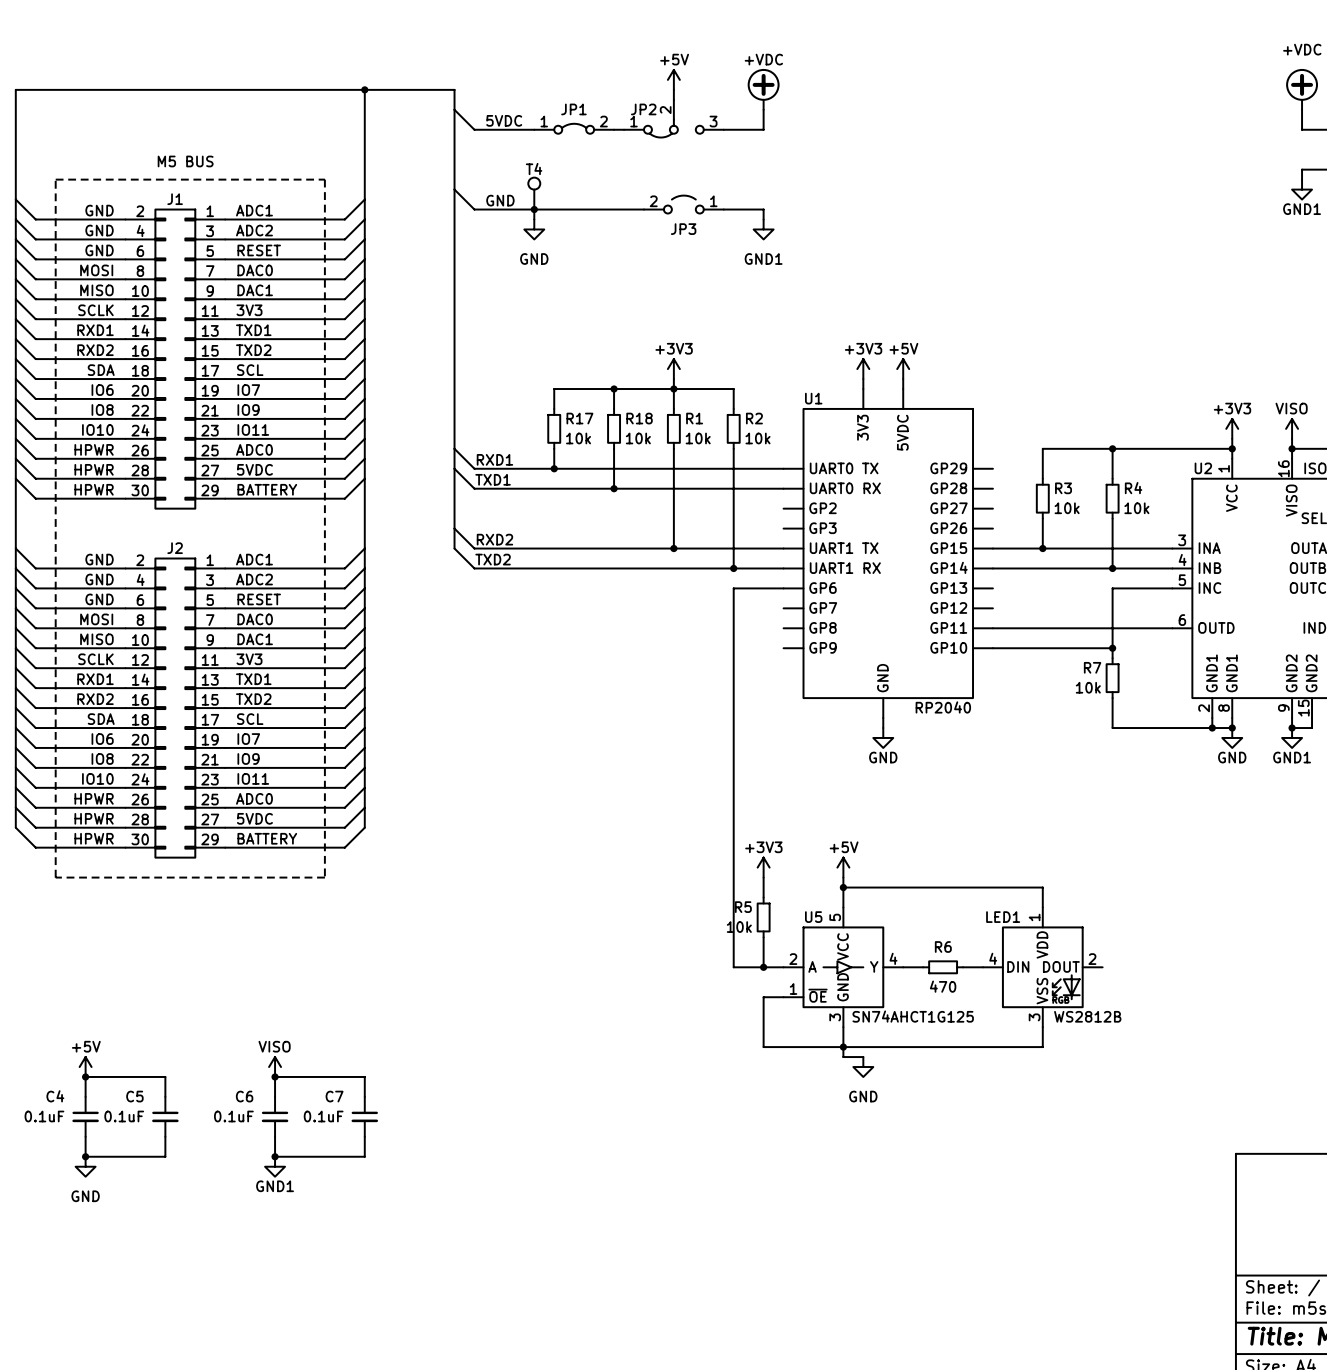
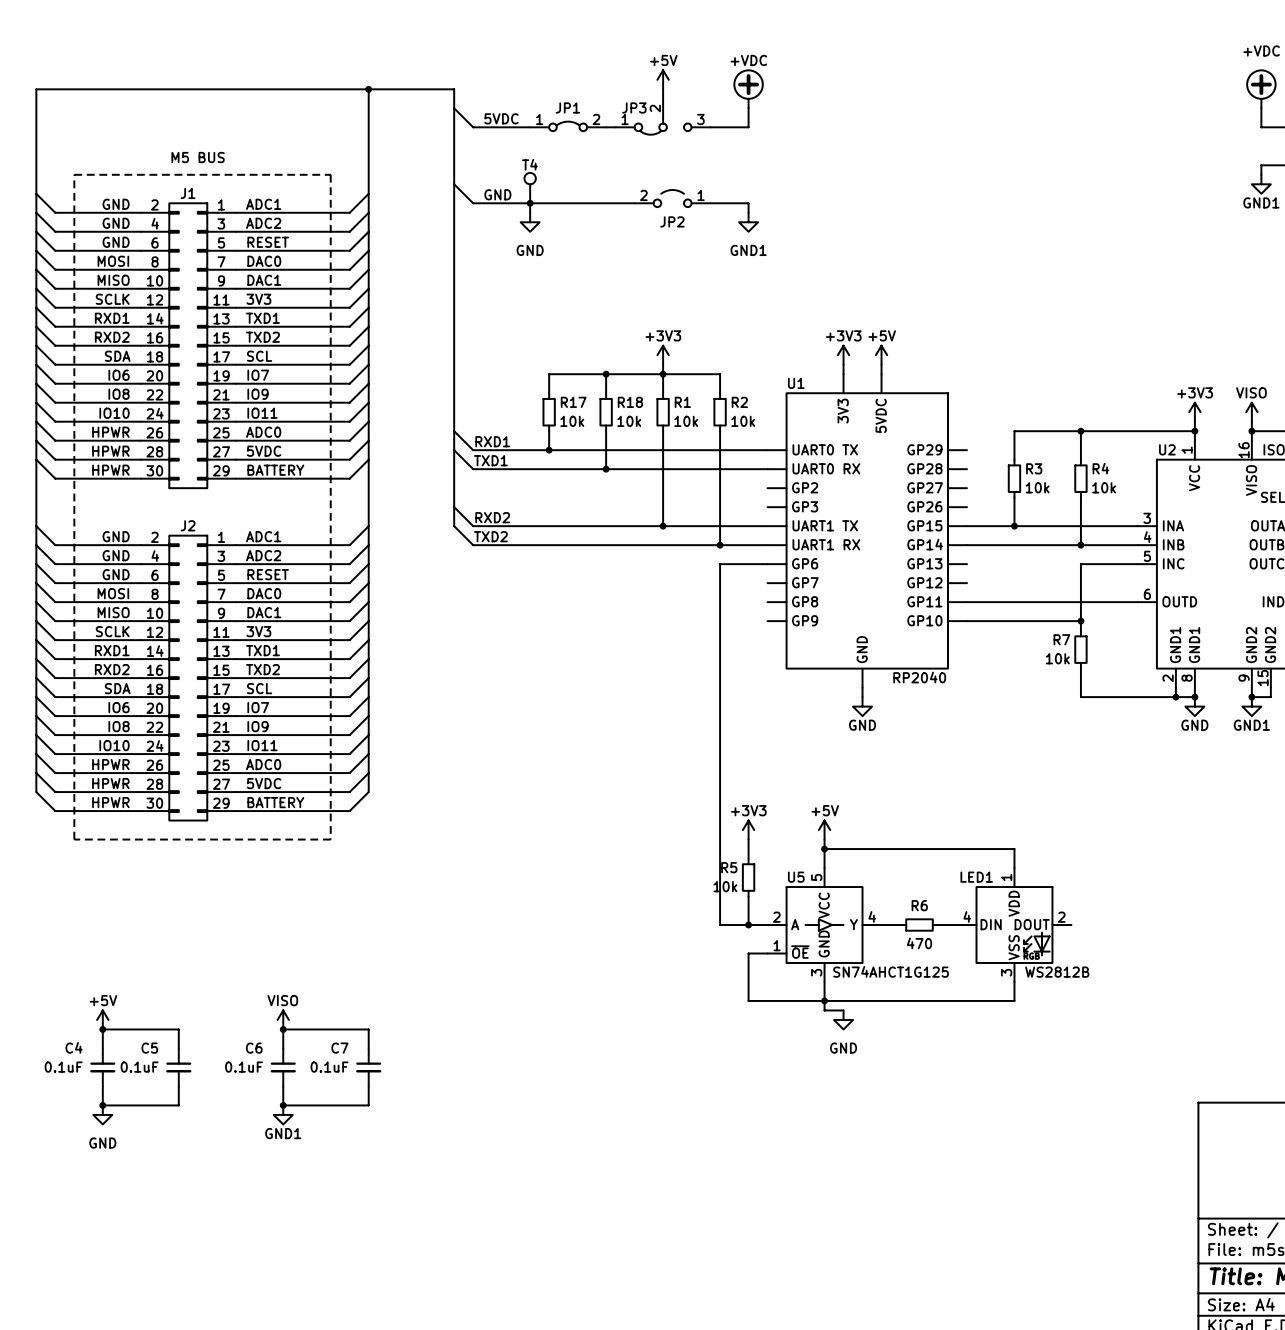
JP2 name: JP2 (643, 109) -> JP3 (634, 107)
JP3 name: JP3 (683, 229) -> JP2 (672, 221)

